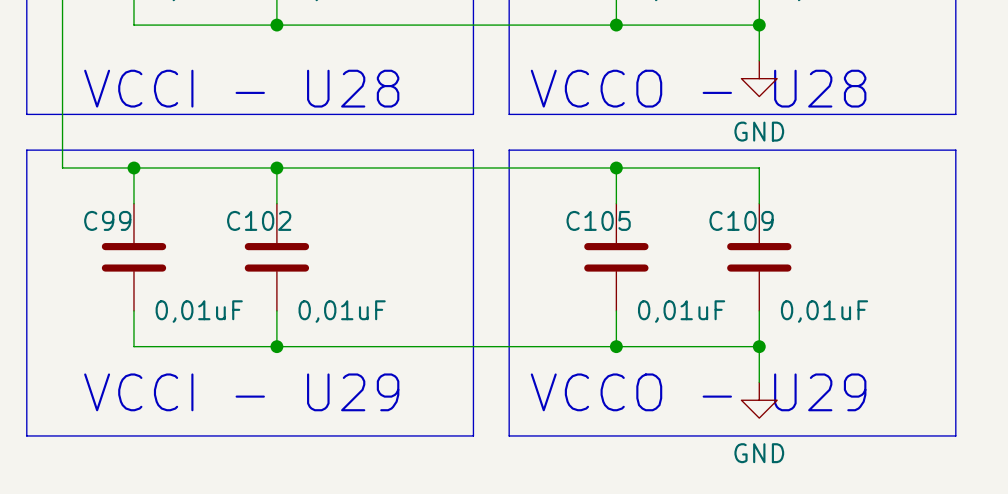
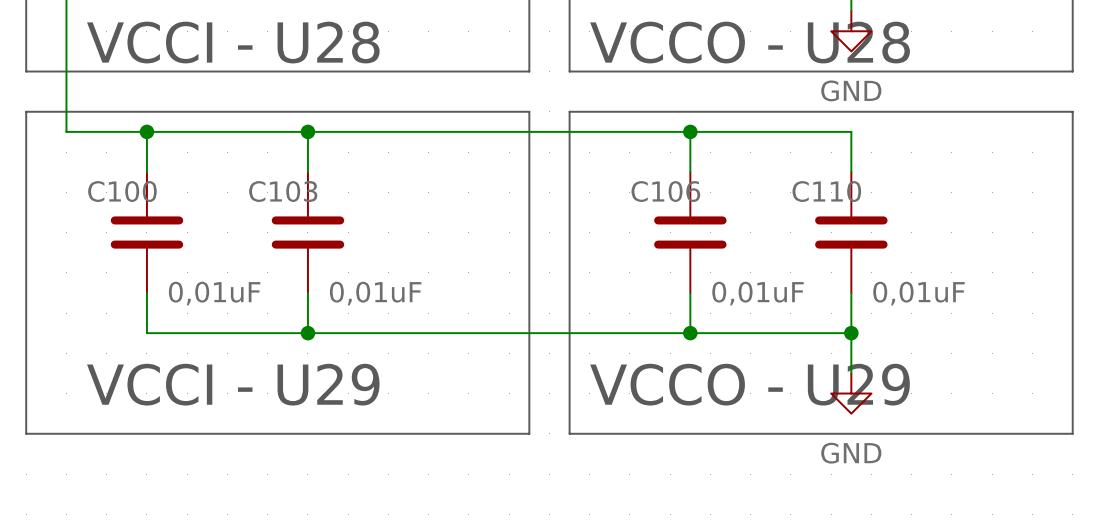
C99 name: C99 (107, 220) -> C100 (122, 191)
C102 name: C102 (259, 220) -> C103 (283, 191)
C105 name: C105 (598, 220) -> C106 (665, 191)
C109 name: C109 (741, 220) -> C110 (826, 191)

